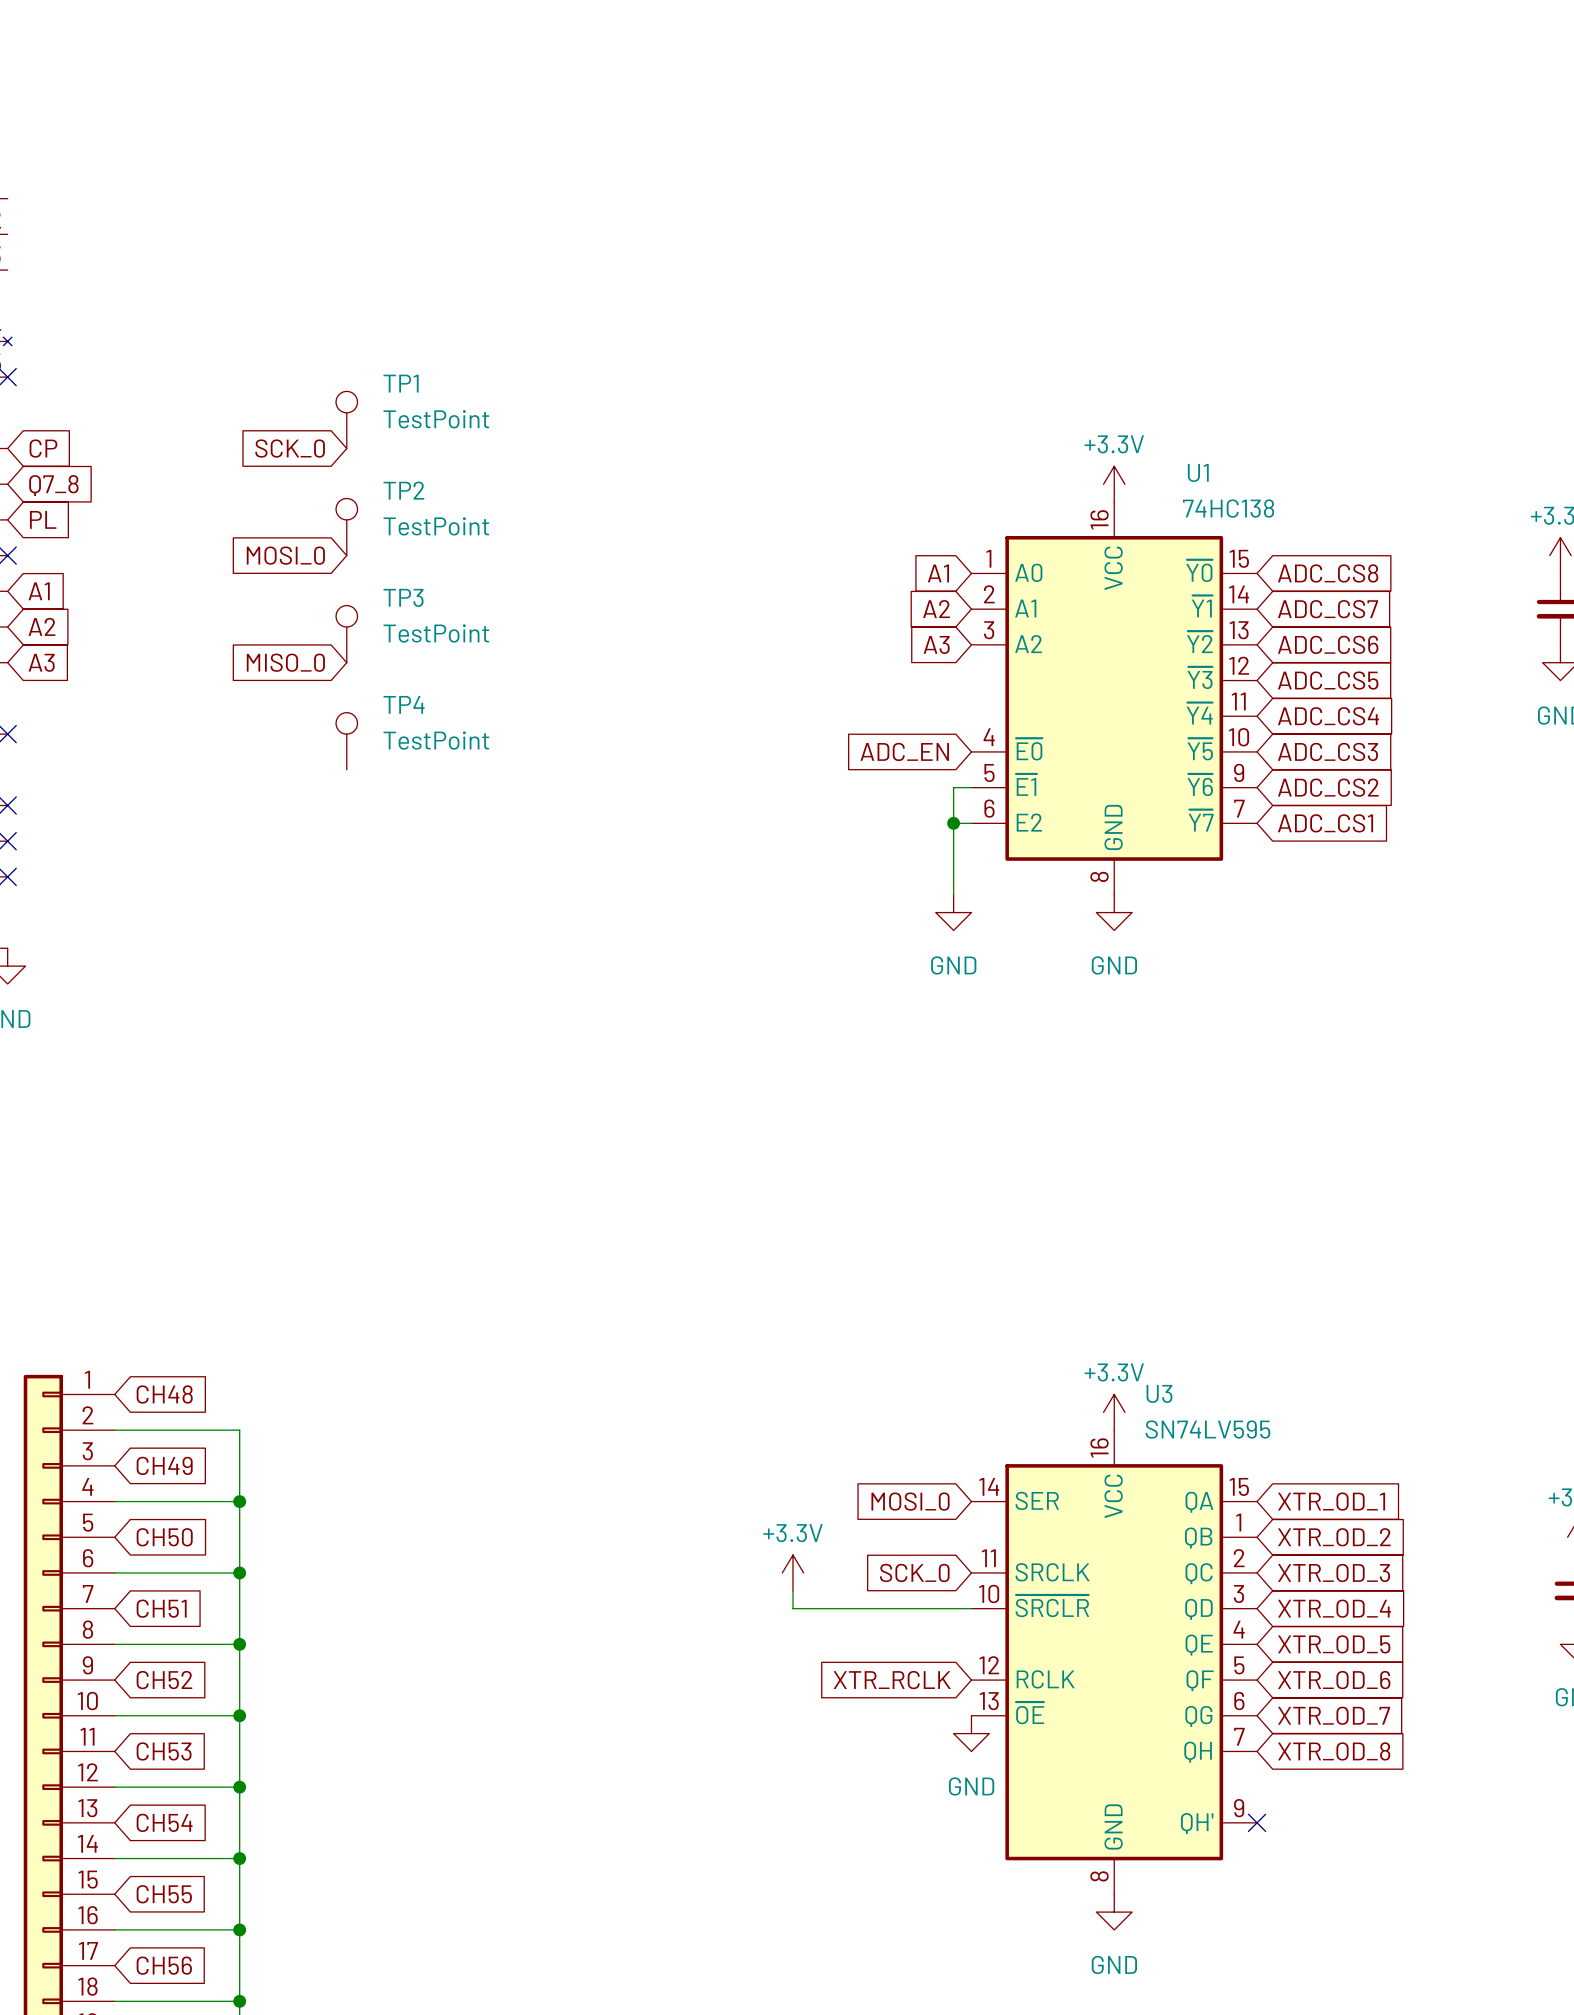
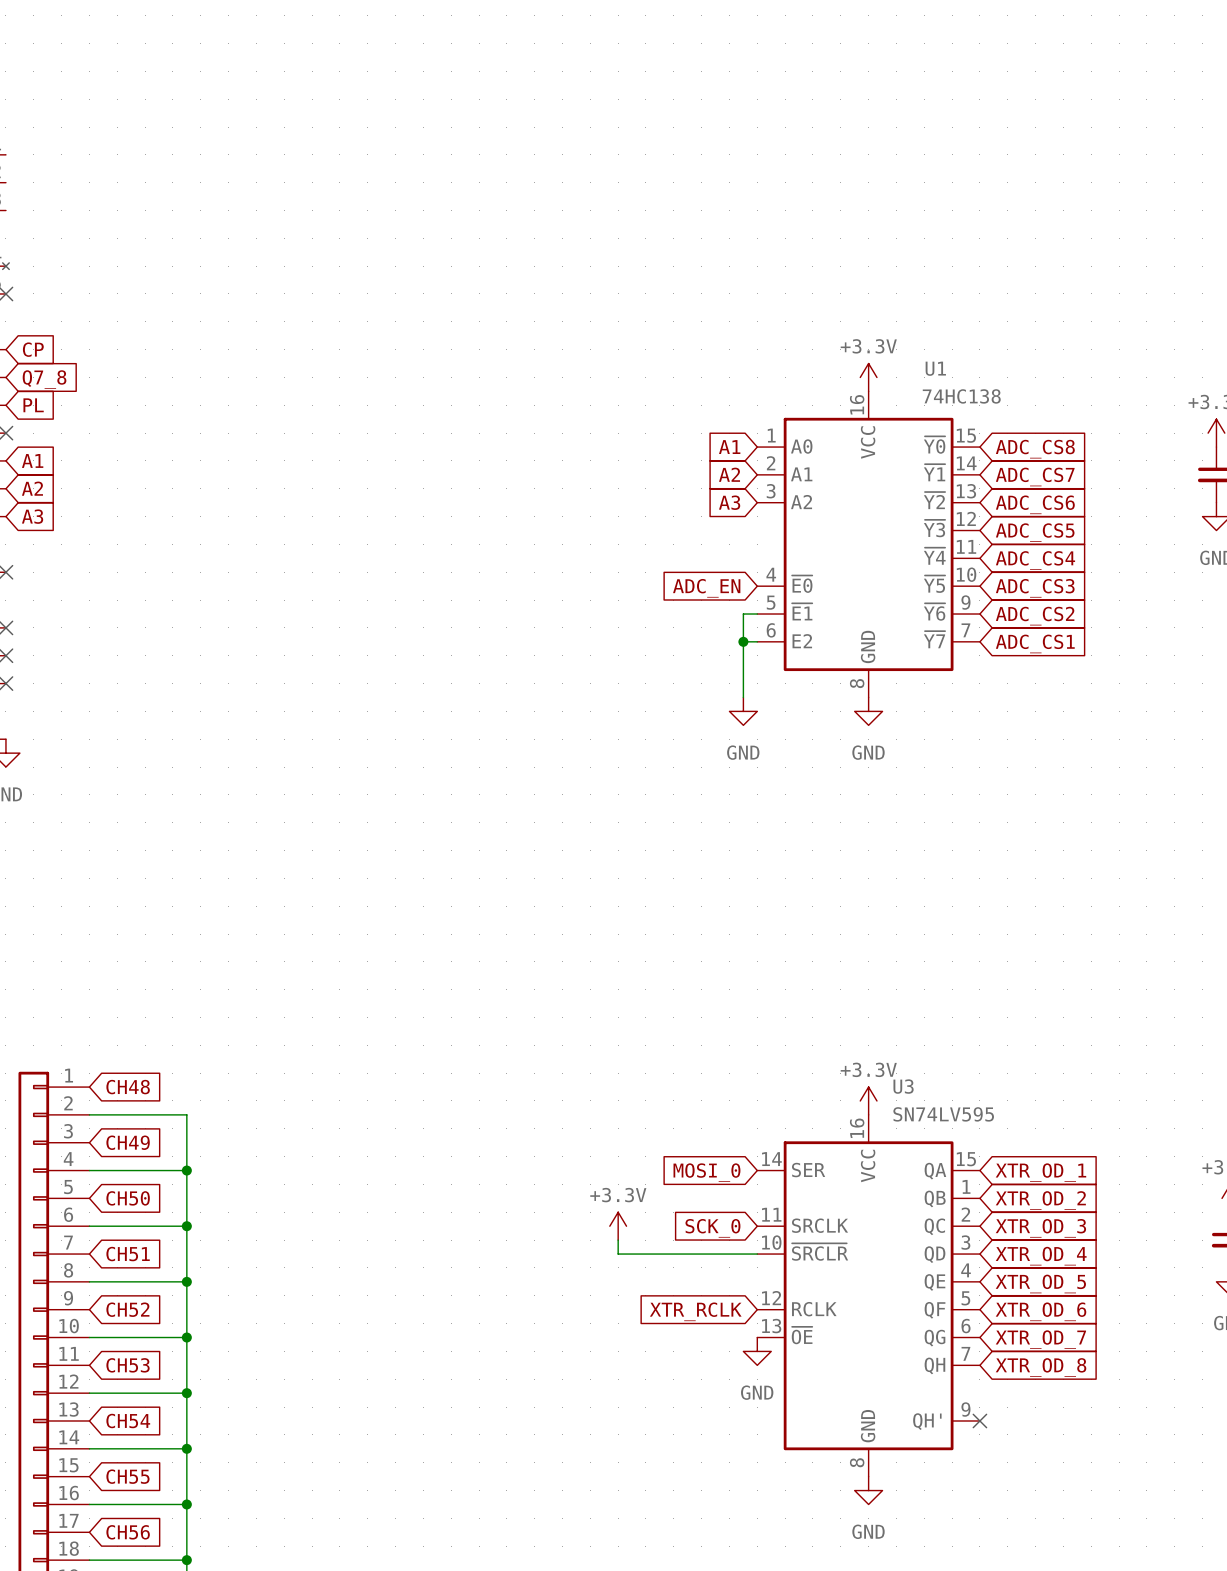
TP1: TestPoint (346, 419) -> none
global label: SCK_0 (290, 448) -> none
TP2: TestPoint (346, 527) -> none
global label: MOSI_0 (285, 555) -> none
TP3: TestPoint (346, 634) -> none
global label: MISO_0 (285, 662) -> none
TP4: TestPoint (346, 741) -> none

